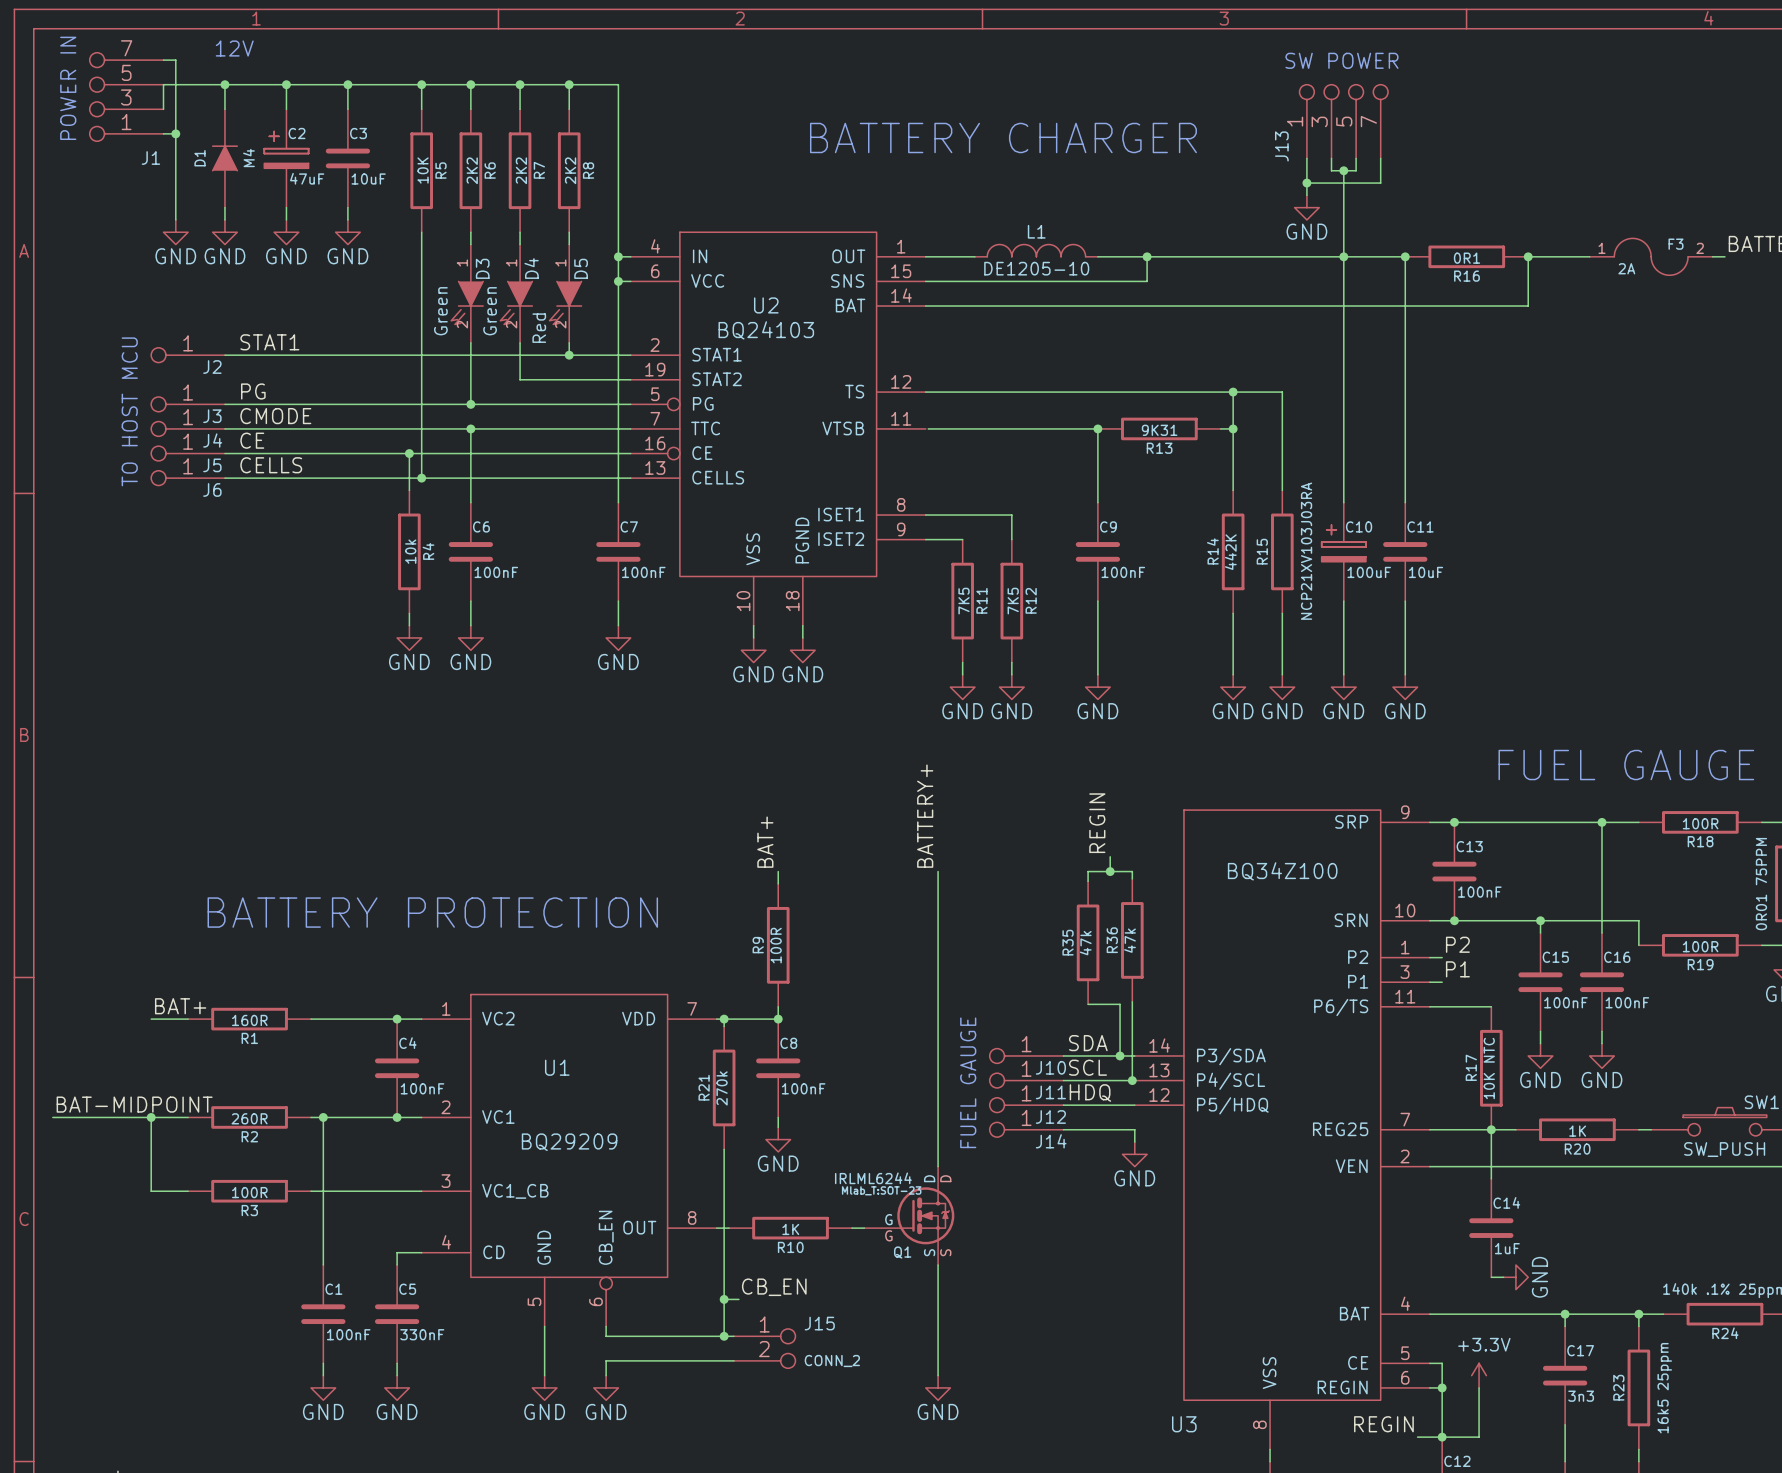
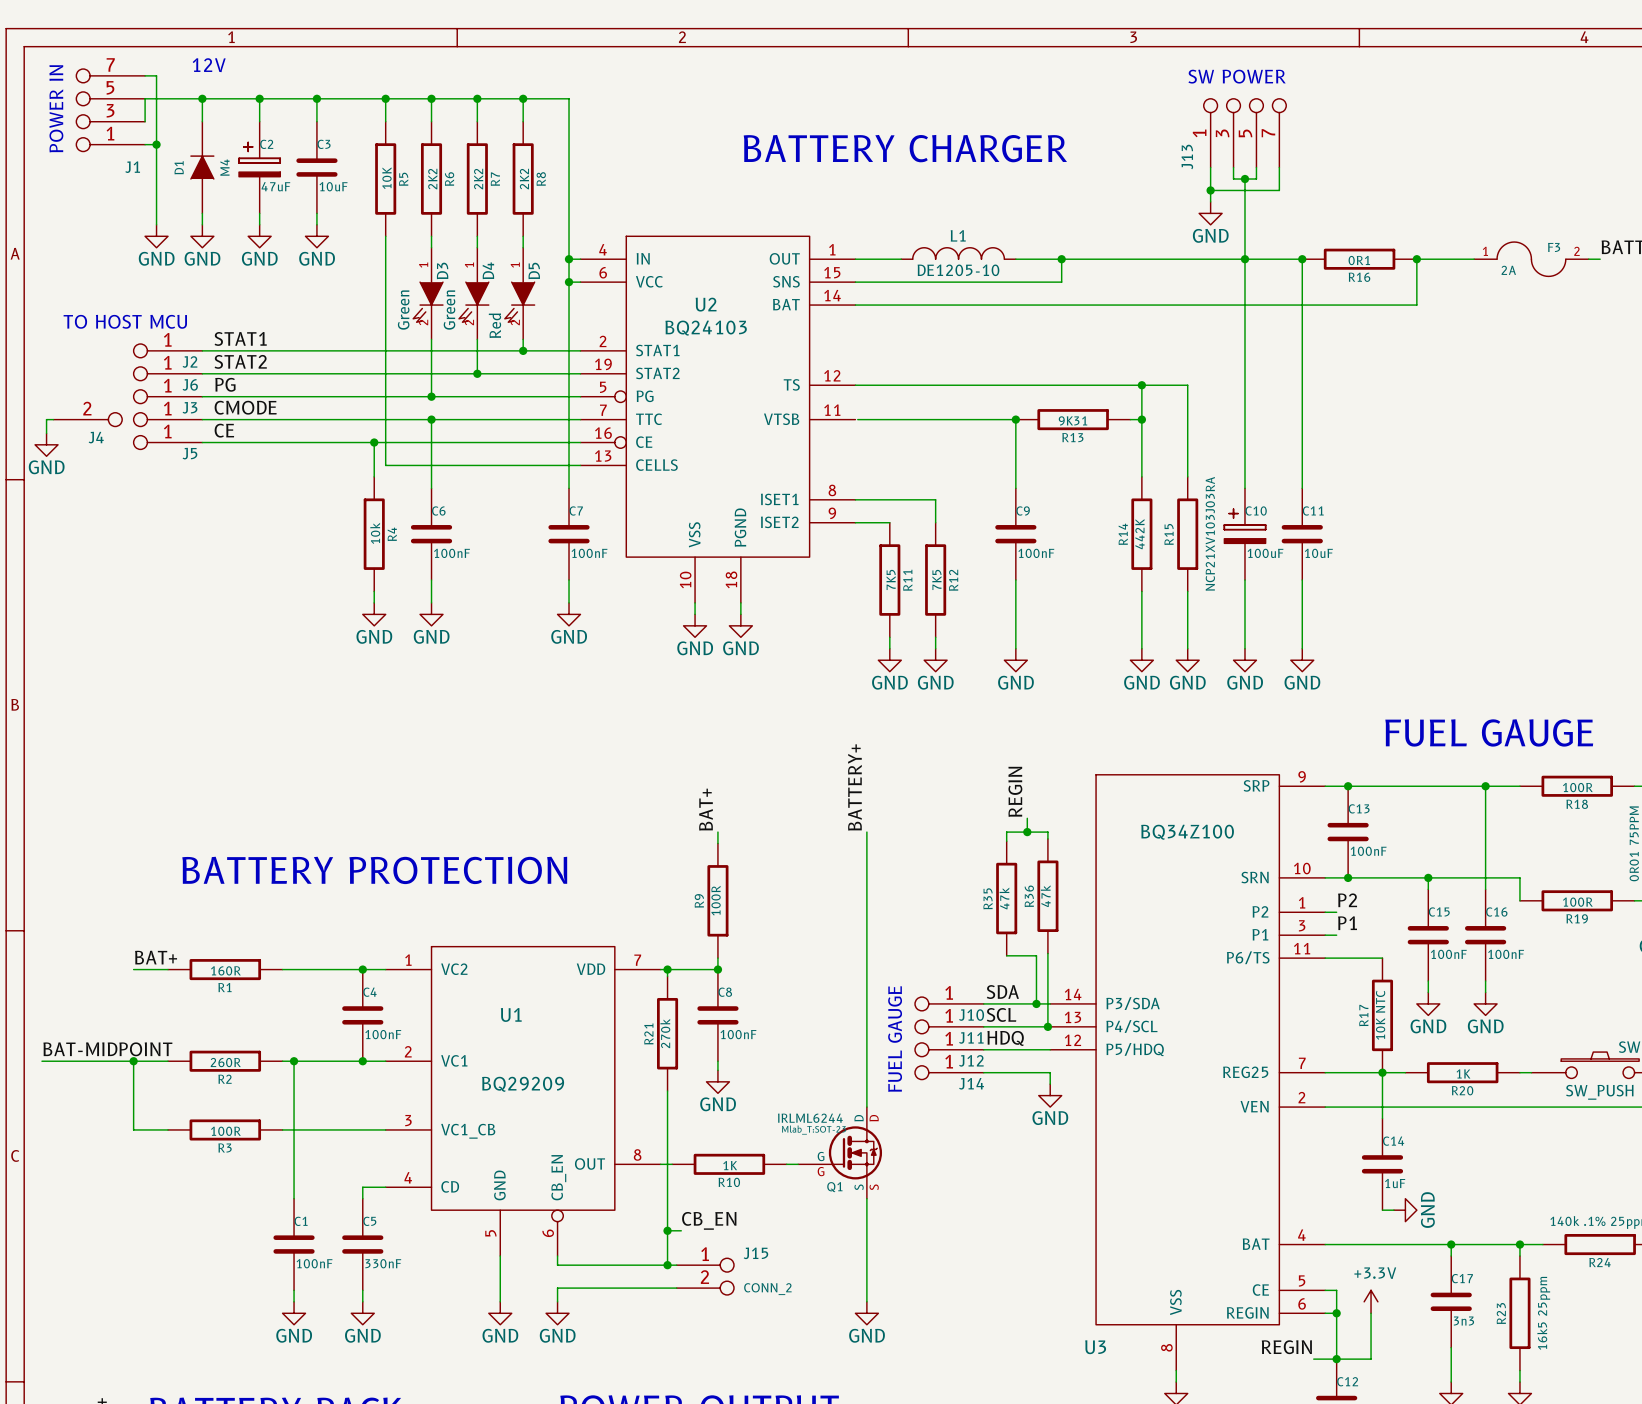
label: none -> STAT2 (240, 361)
wire: none -> (202, 373) (477, 373)
junction: none -> (477, 373)
text rotation: 0° (129, 411) -> 90° clockwise (125, 321)
J4 symbol: [151, 421, 225, 437] -> [53, 412, 203, 427]
wire: none -> (53, 419) (46, 419) (46, 433)
J4 name position: J4 (212, 440) -> J4 (96, 437)
power symbol: none -> GND (46, 444)
label: CELLS (271, 465) -> none
J6 position: (188, 478) -> (168, 373)
wire: (224, 478) (421, 478) -> none
junction: (421, 478) -> none

